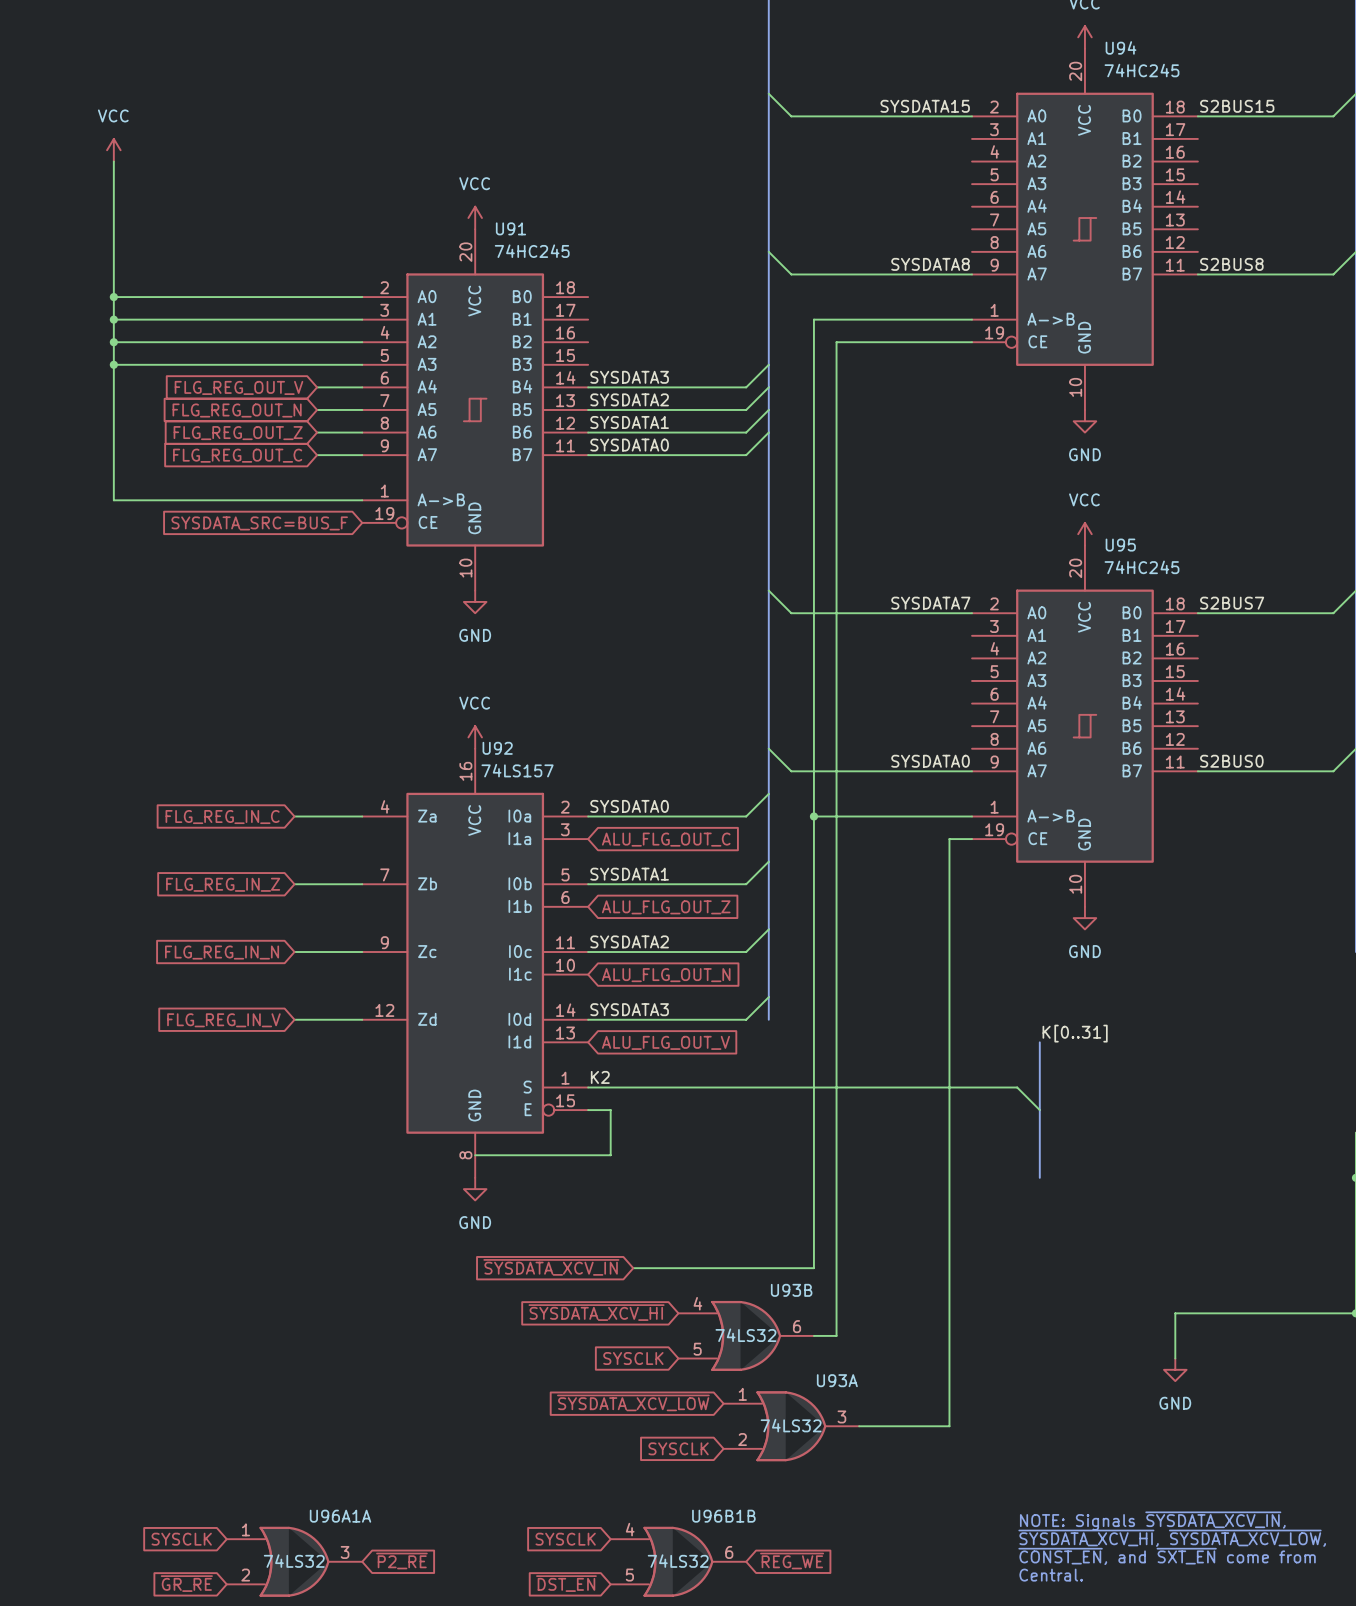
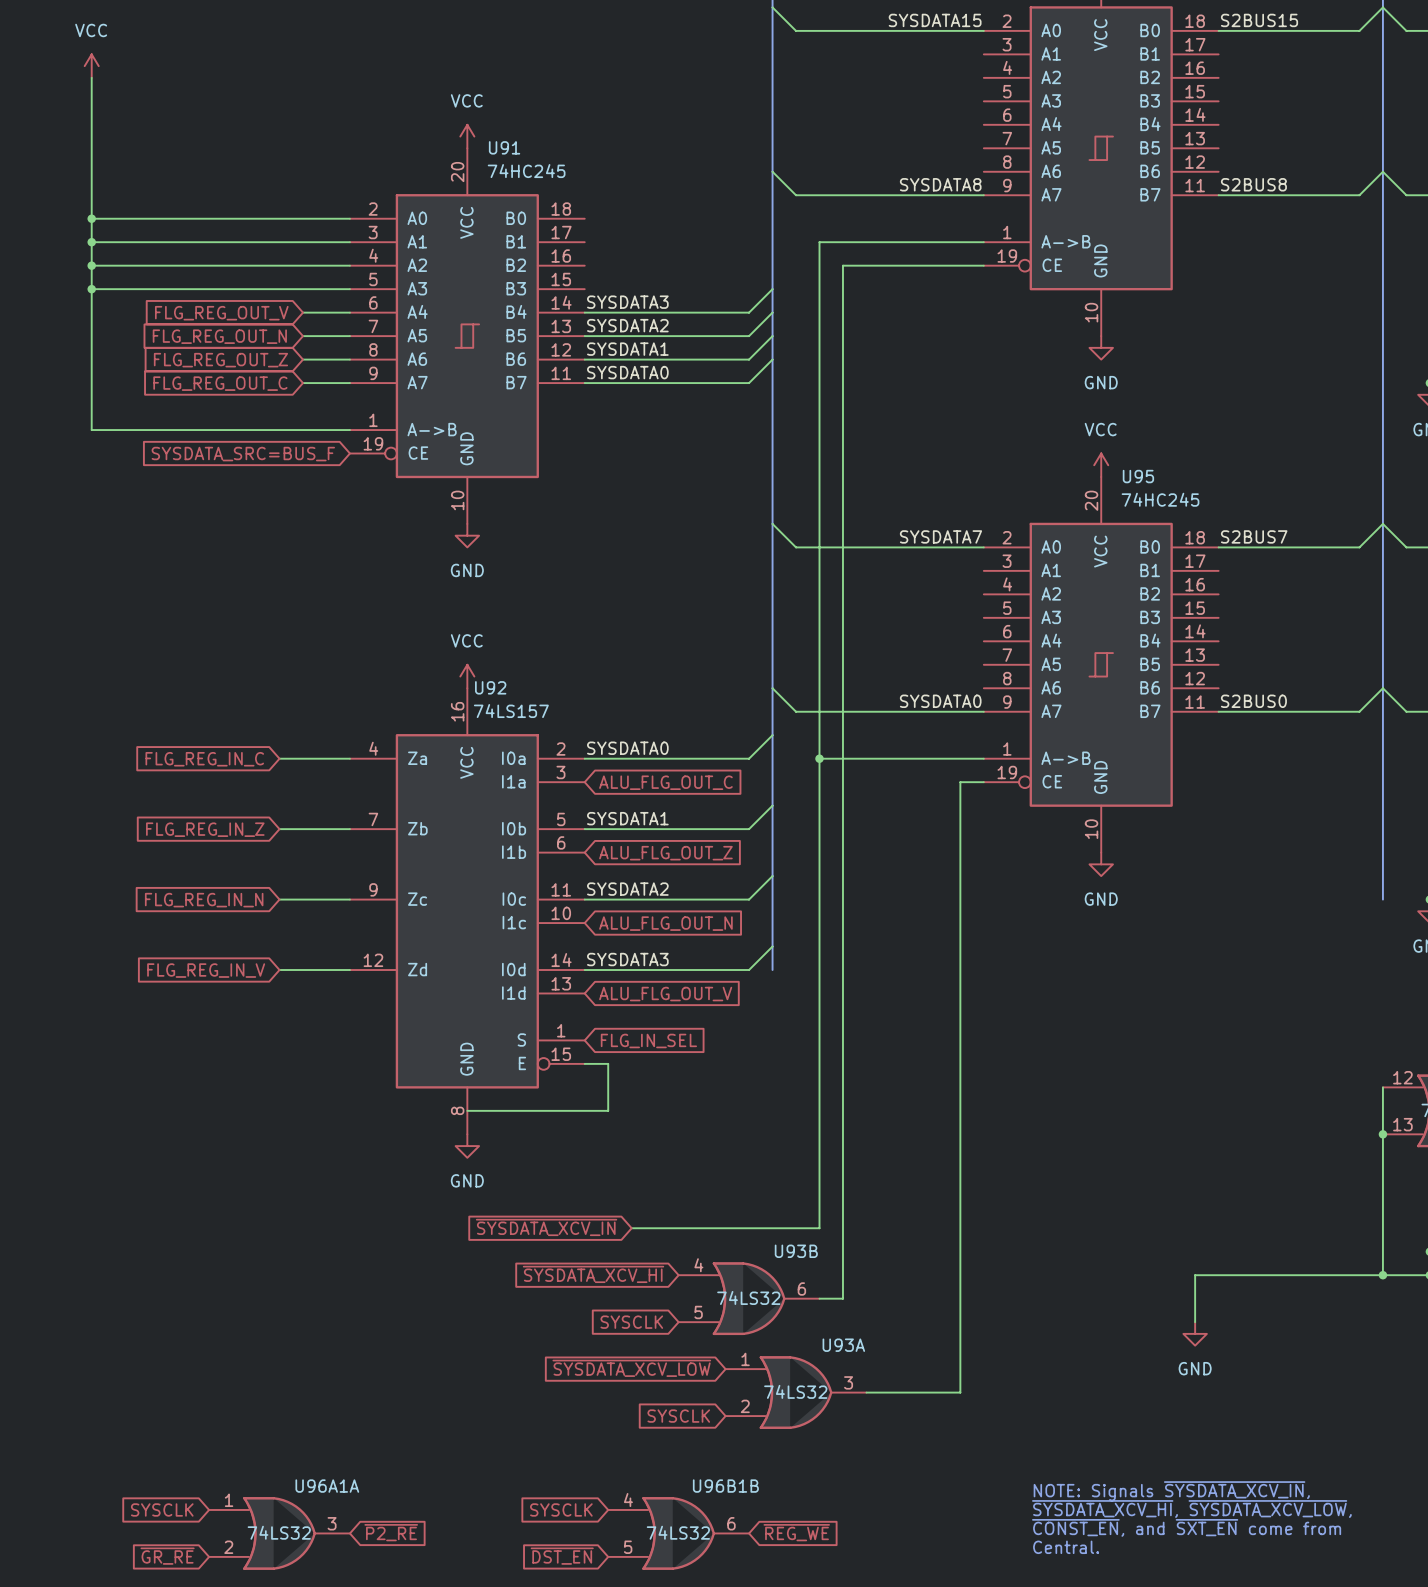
label: K[0..31] (1075, 1033) -> none
bus: (1039, 1042) (1039, 1177) -> none
label: K2 (600, 1077) -> none
wire: (588, 1087) (1017, 1087) (1039, 1110) -> none
global label: none -> FLG_IN_SEL (648, 1040)

